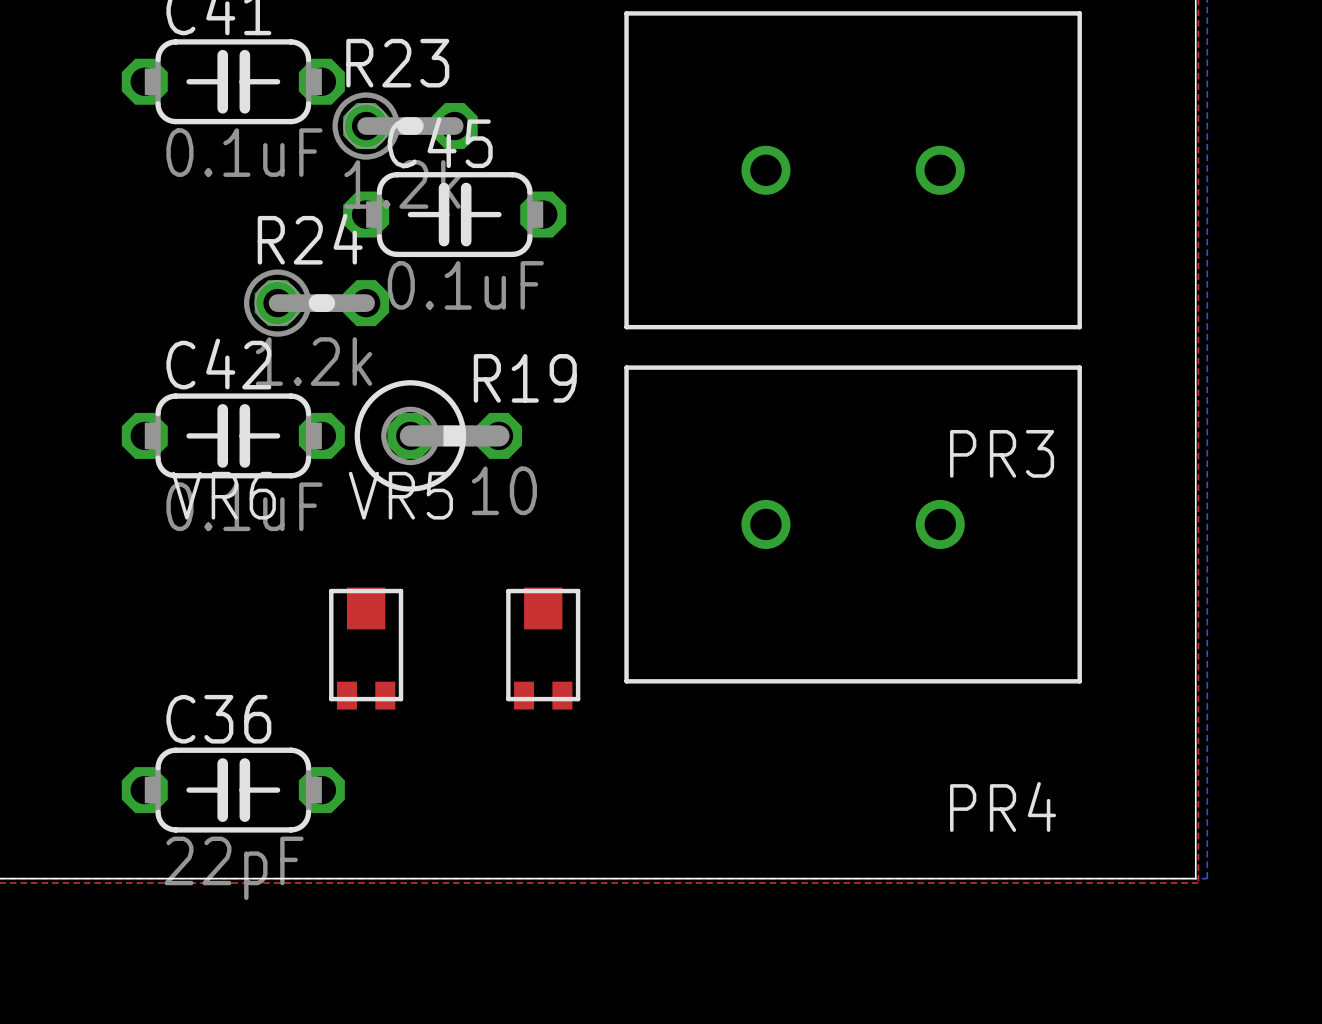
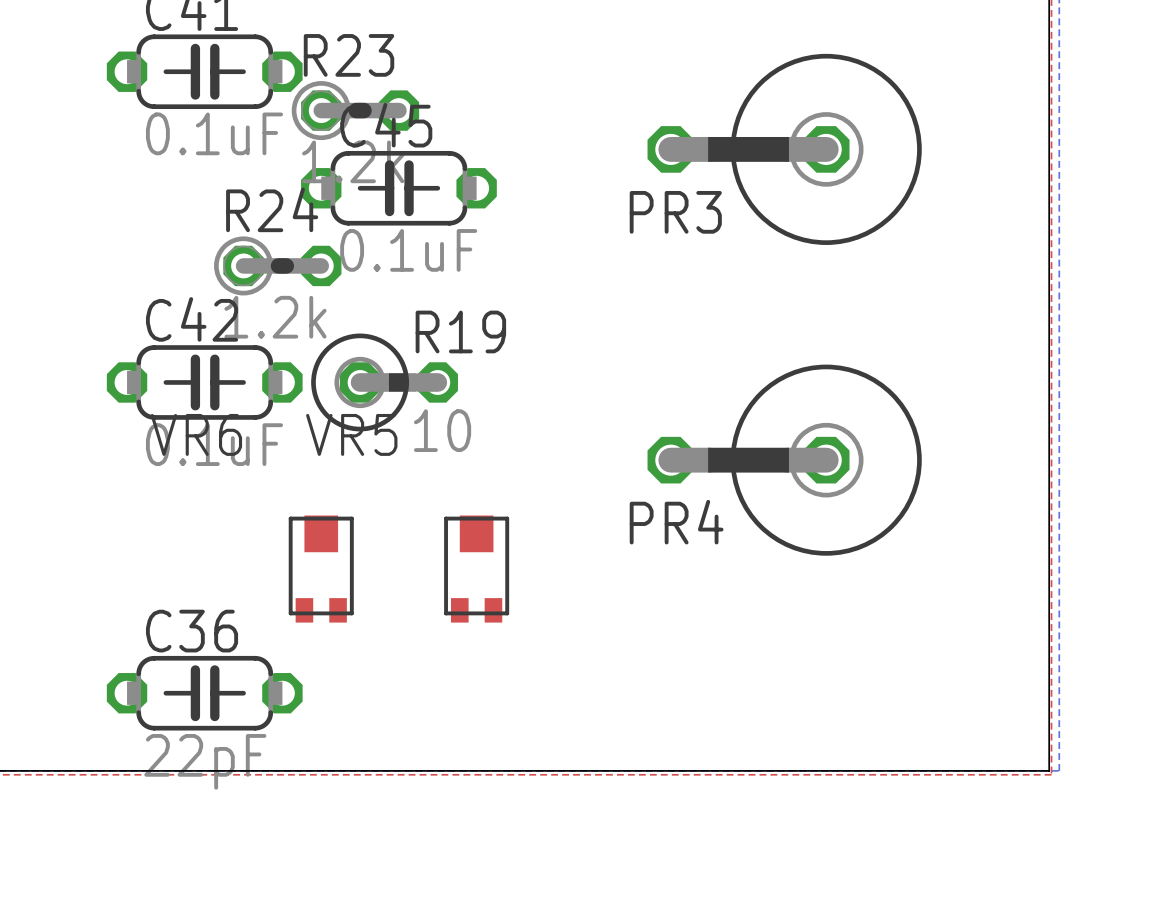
PR3 footprint: [624, 11, 1082, 330] -> [647, 53, 922, 245]
PR4 footprint: [624, 365, 1082, 684] -> [647, 364, 922, 556]
PR3 name position: PR3 (1002, 453) -> PR3 (675, 212)
PR4 name position: PR4 (1003, 806) -> PR4 (676, 522)

